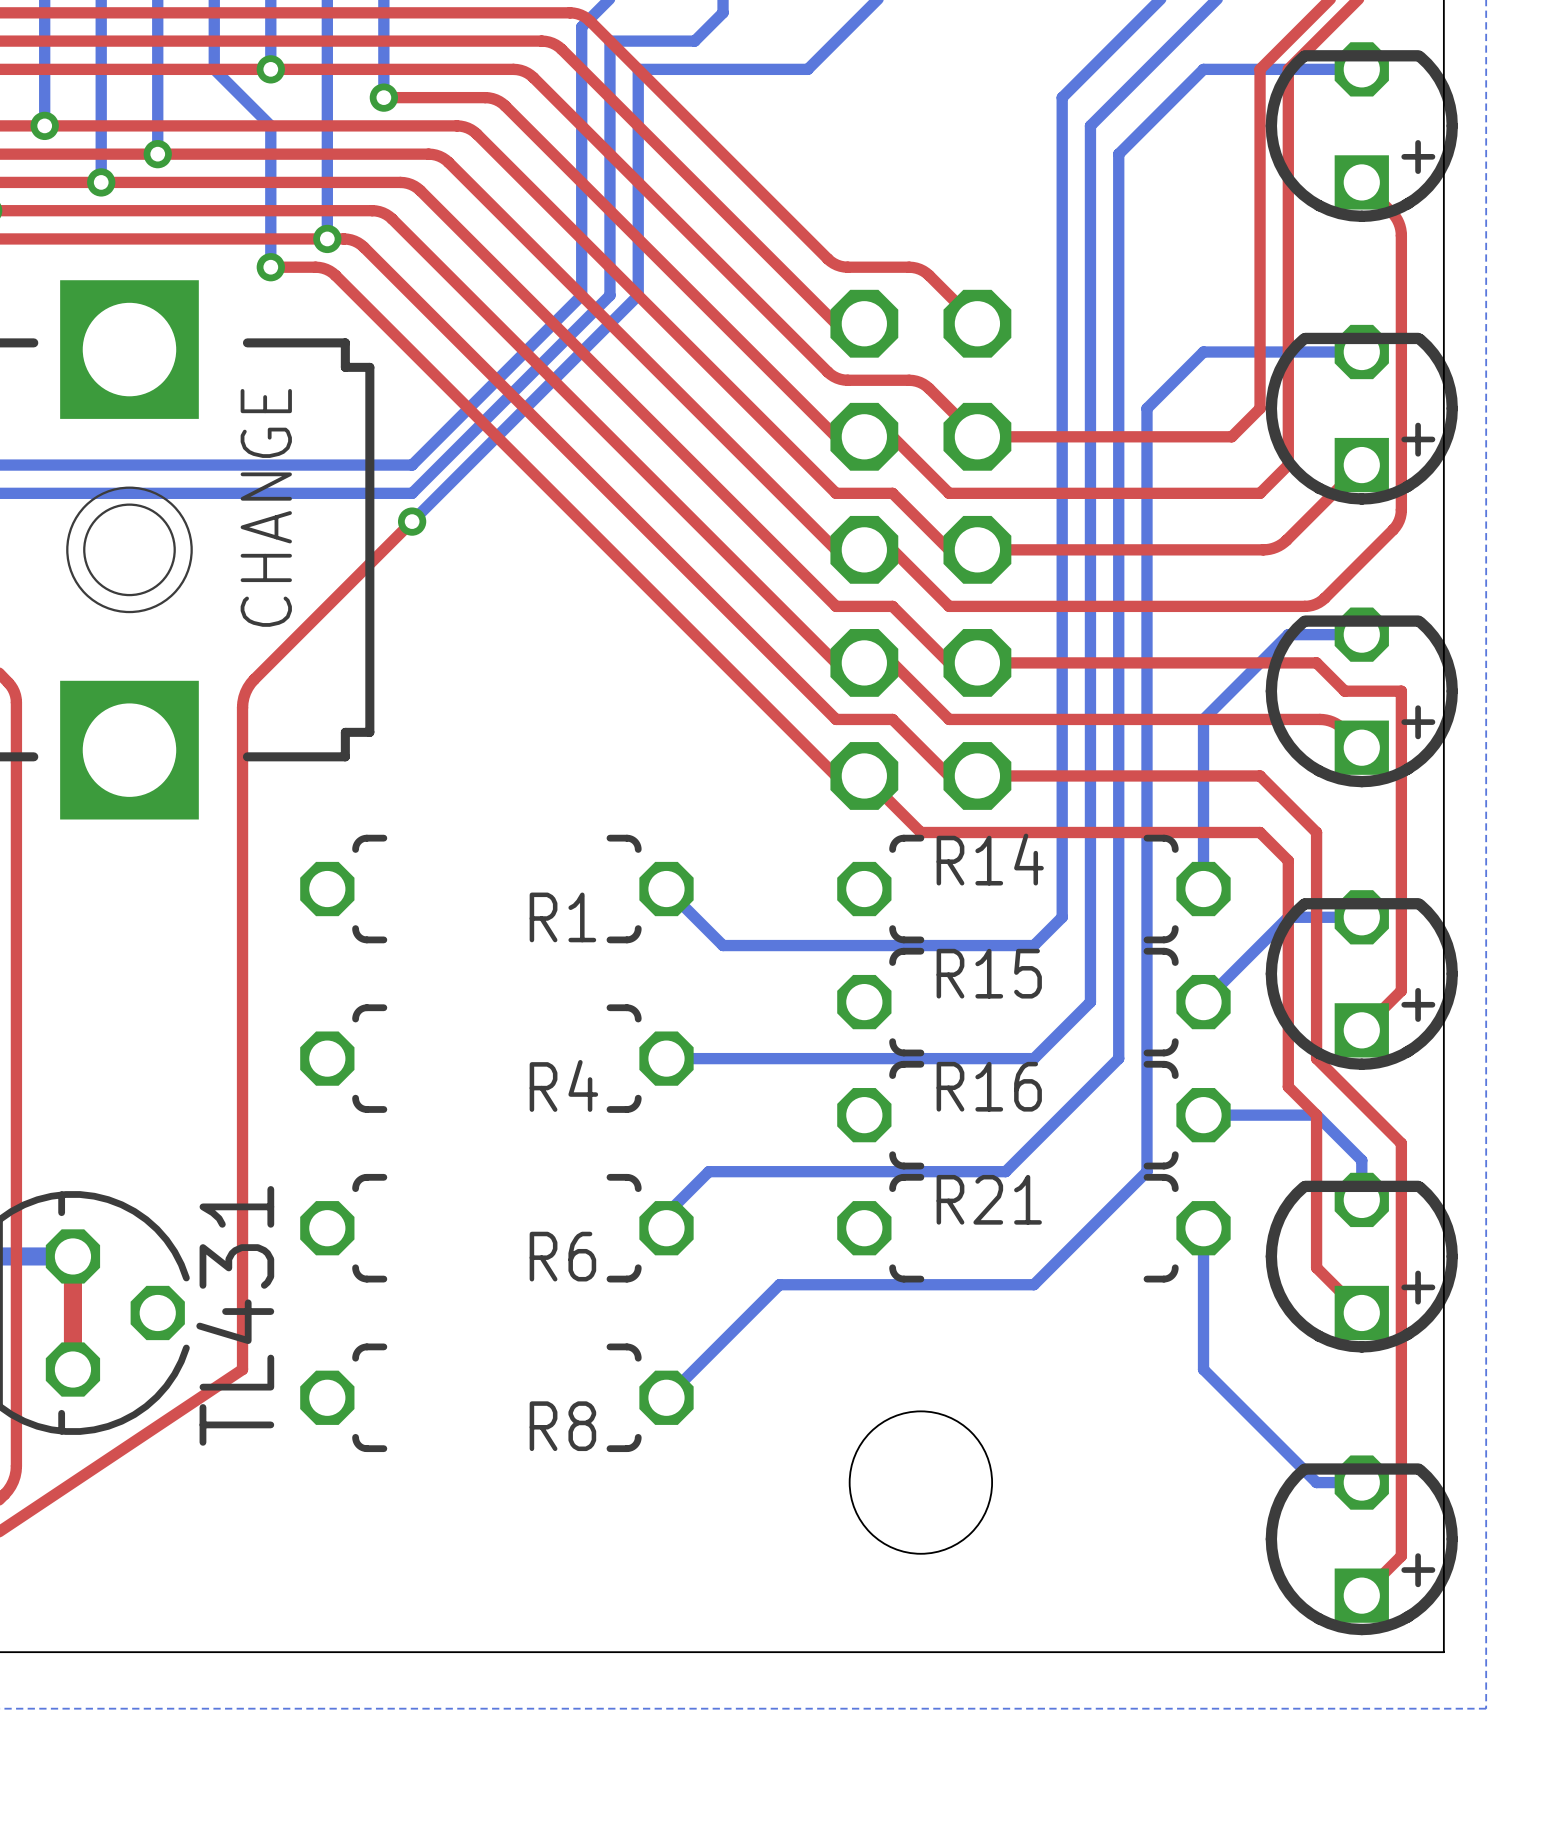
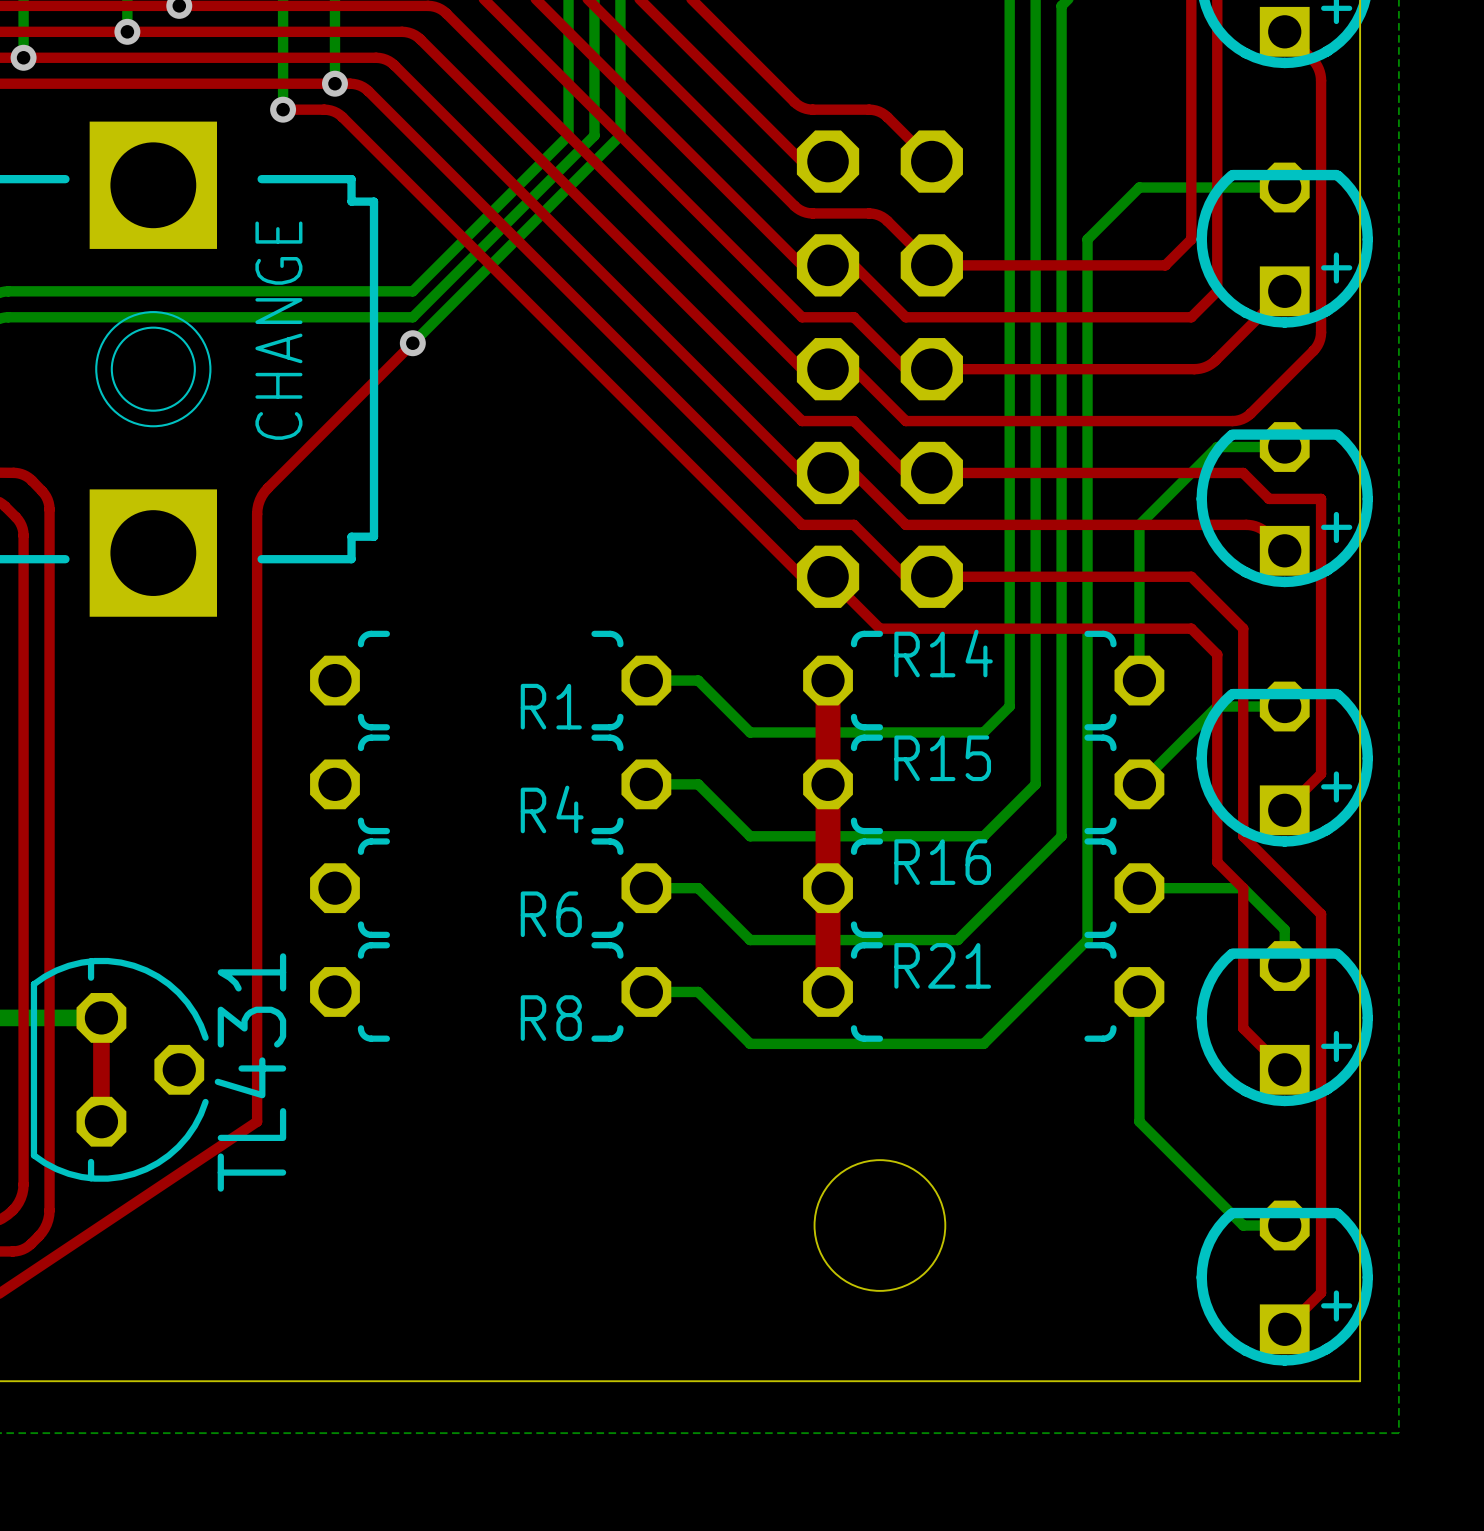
bottom track: (666, 889) (723, 945) (779, 945) -> (646, 680) (698, 680) (750, 732)
top track: none -> (828, 680) (828, 991)
R4 position: (496, 1058) -> (490, 784)
bottom track: (666, 1058) (779, 1058) -> (646, 784) (698, 784) (750, 836)
R6: none -> (490, 888)
bottom track: (779, 1171) (708, 1171) (666, 1214) (666, 1228) -> (750, 940) (698, 888) (646, 888)
R6 name: R6 (562, 1256) -> R8 (551, 1018)
bottom track: (779, 1284) (666, 1397) -> (750, 1043) (698, 991) (646, 991)
R8: (496, 1397) -> none

